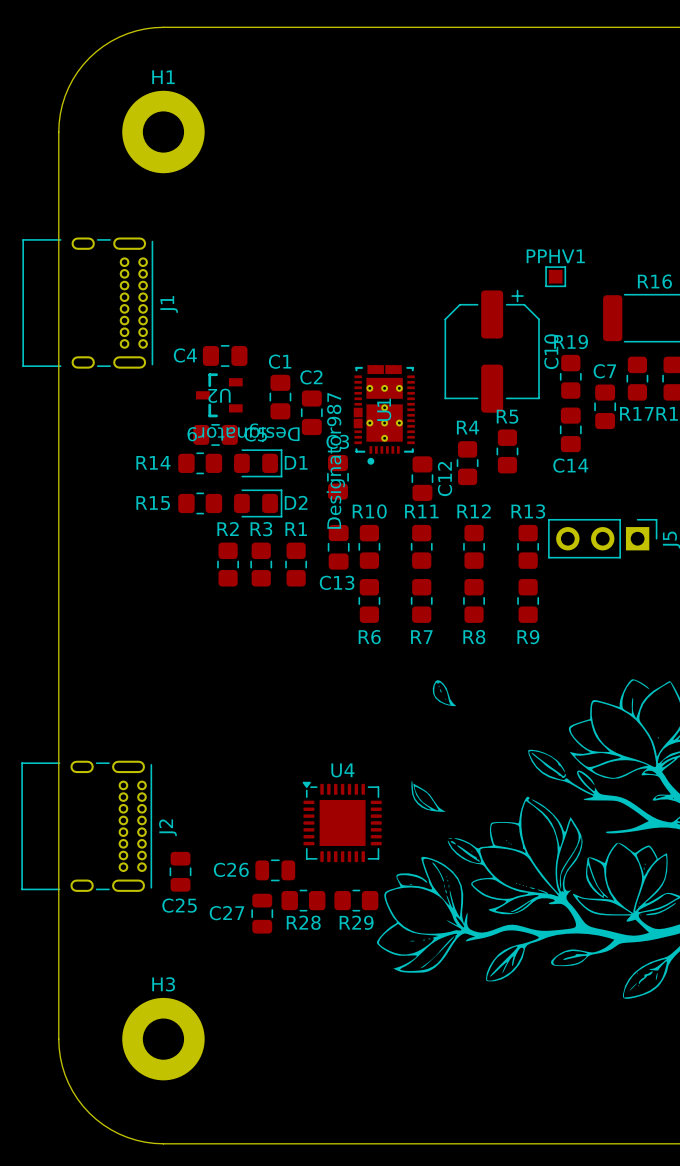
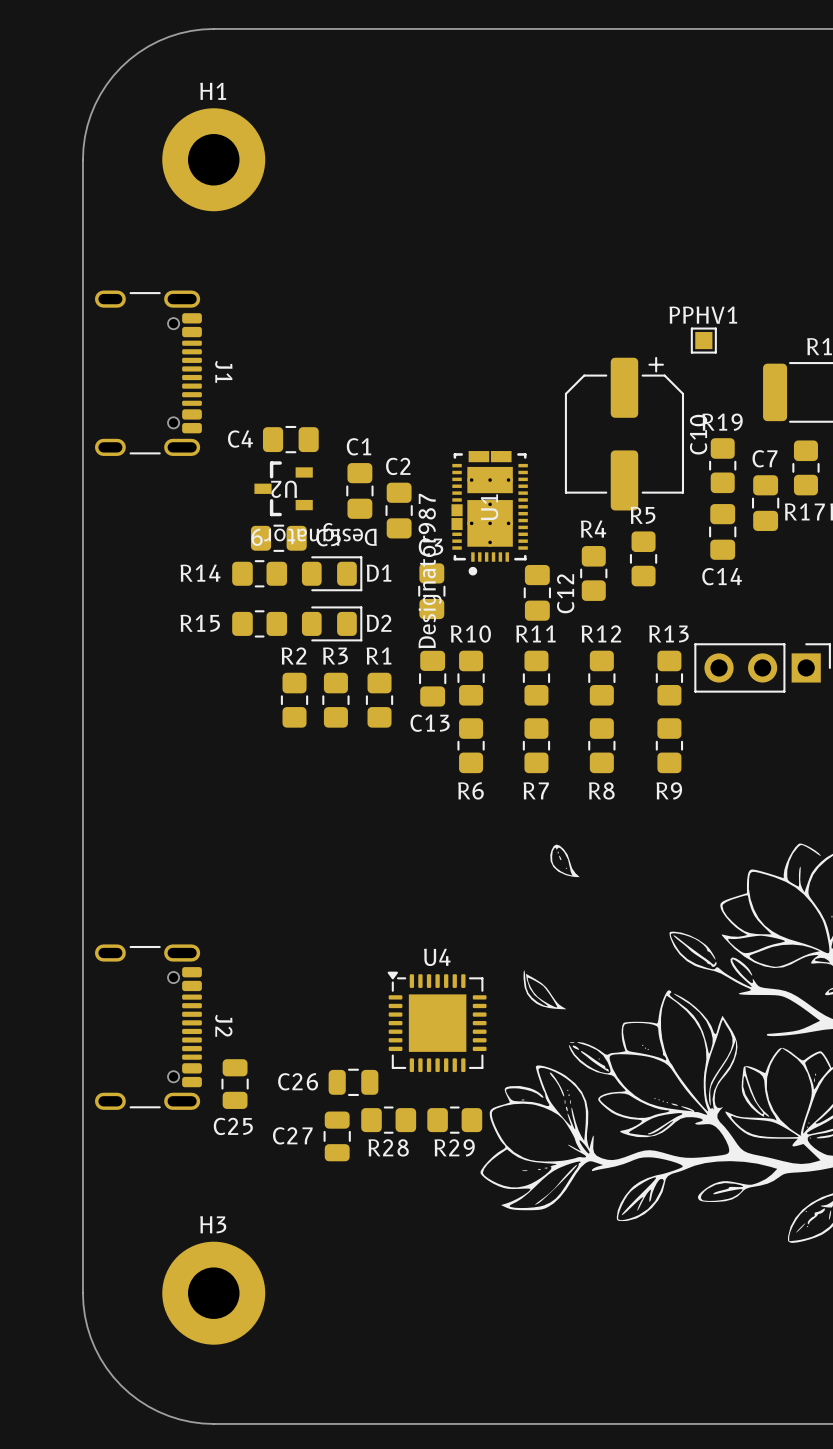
J1 footprint: [22, 237, 154, 369] -> [94, 290, 202, 456]
J2 footprint: [21, 760, 153, 892] -> [94, 944, 202, 1110]

